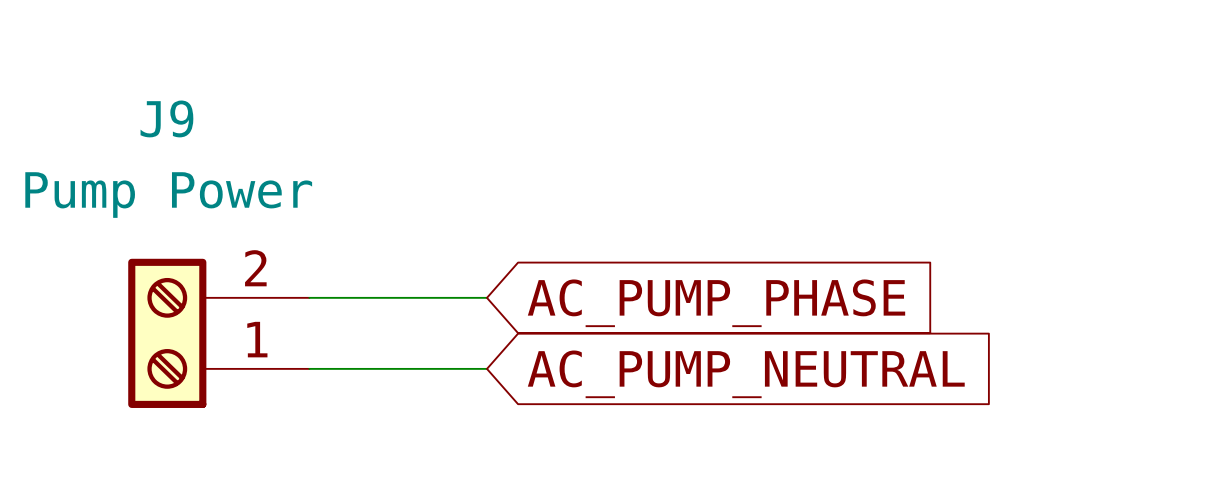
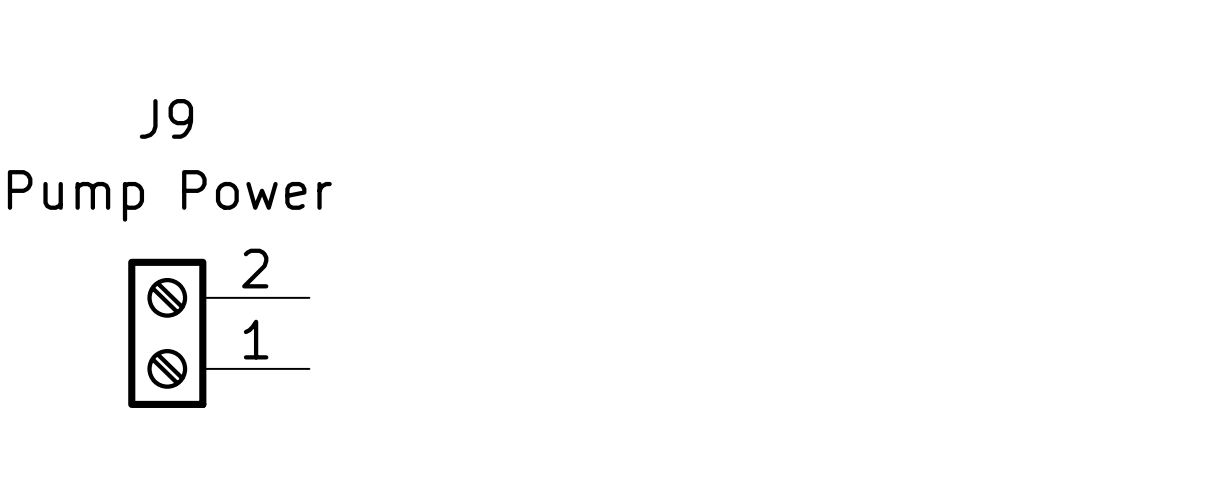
wire: (309, 297) (486, 297) -> none
global label: AC_PUMP_PHASE (716, 303) -> none
wire: (309, 368) (486, 368) -> none
global label: AC_PUMP_NEUTRAL (746, 374) -> none

